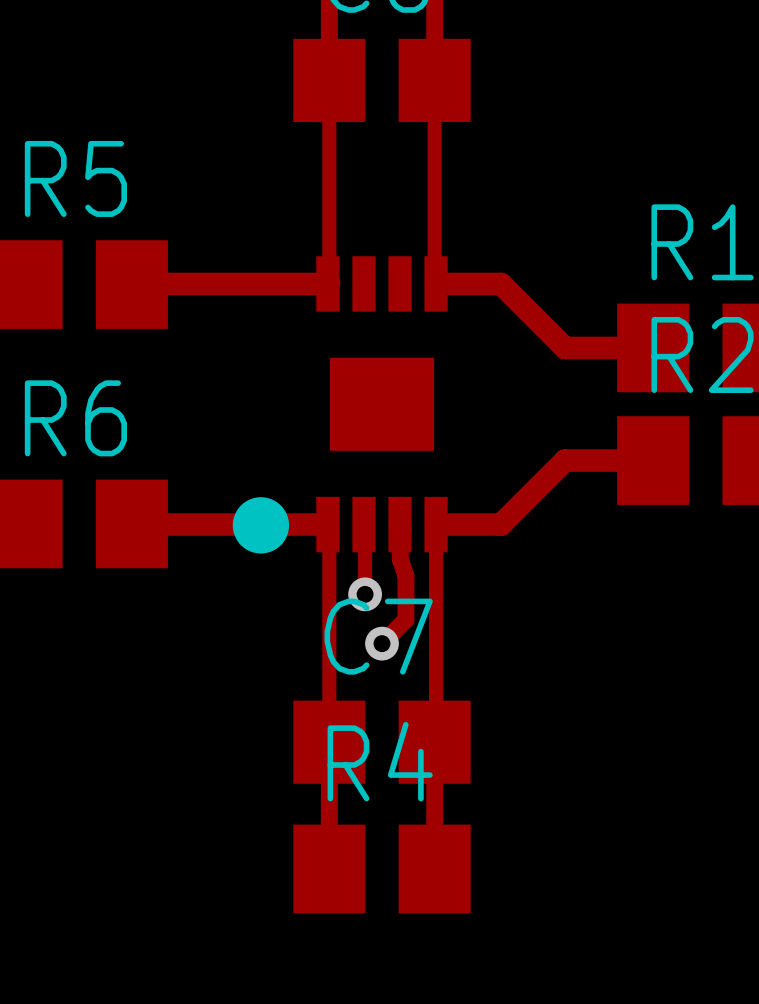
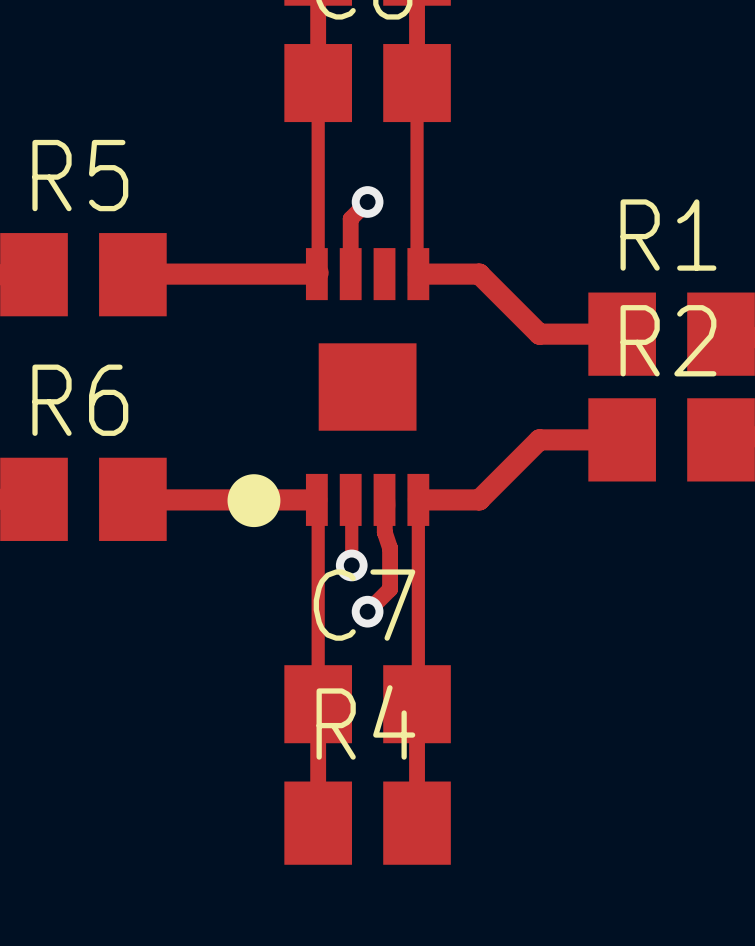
track: none -> (367, 201) (350, 218) (350, 274)
via: none -> (367, 201)

